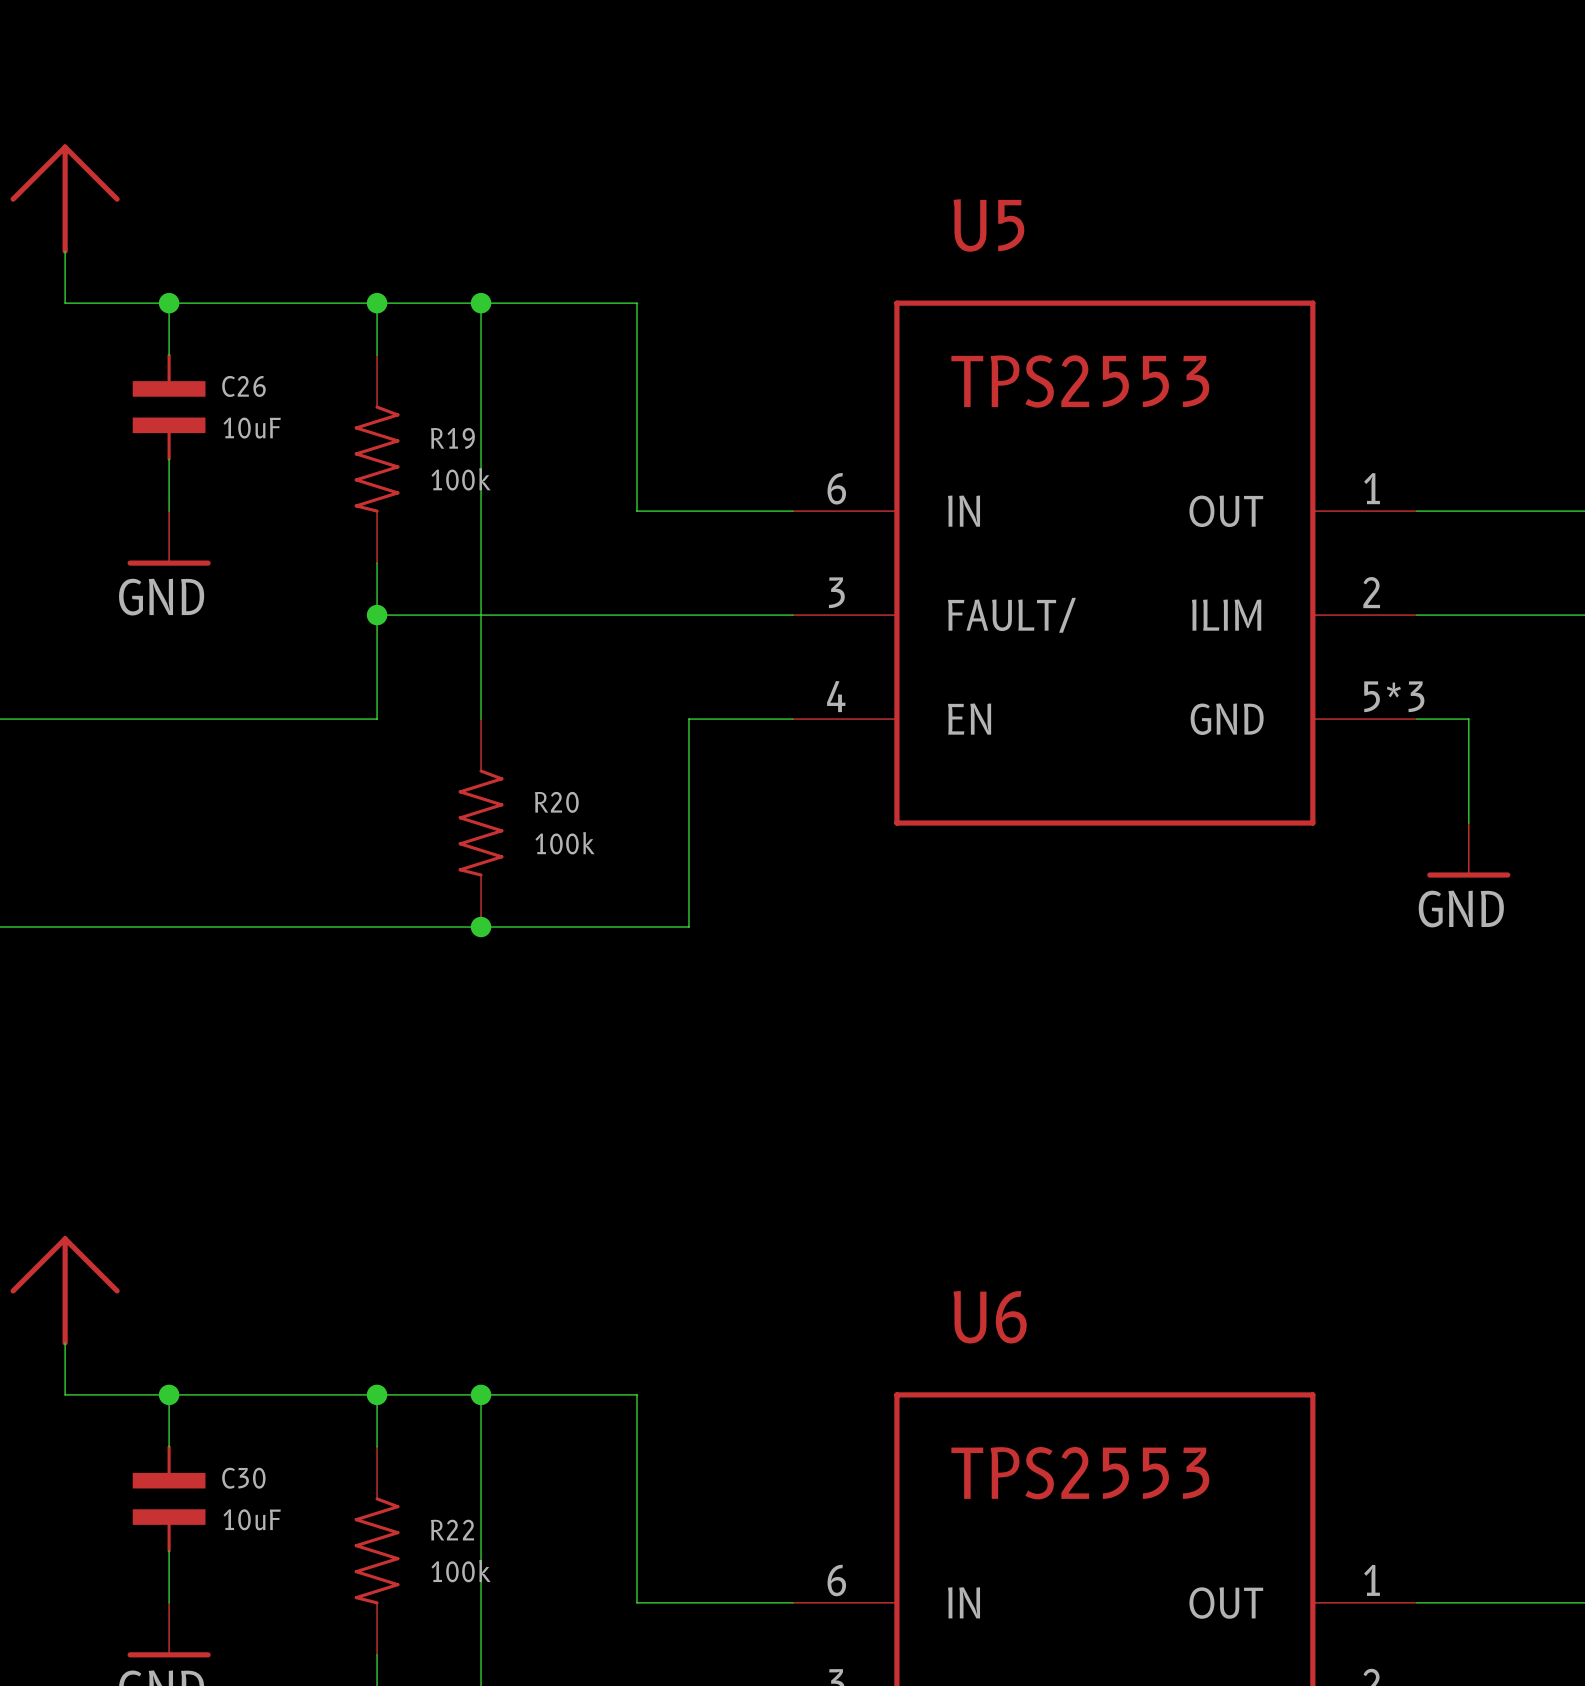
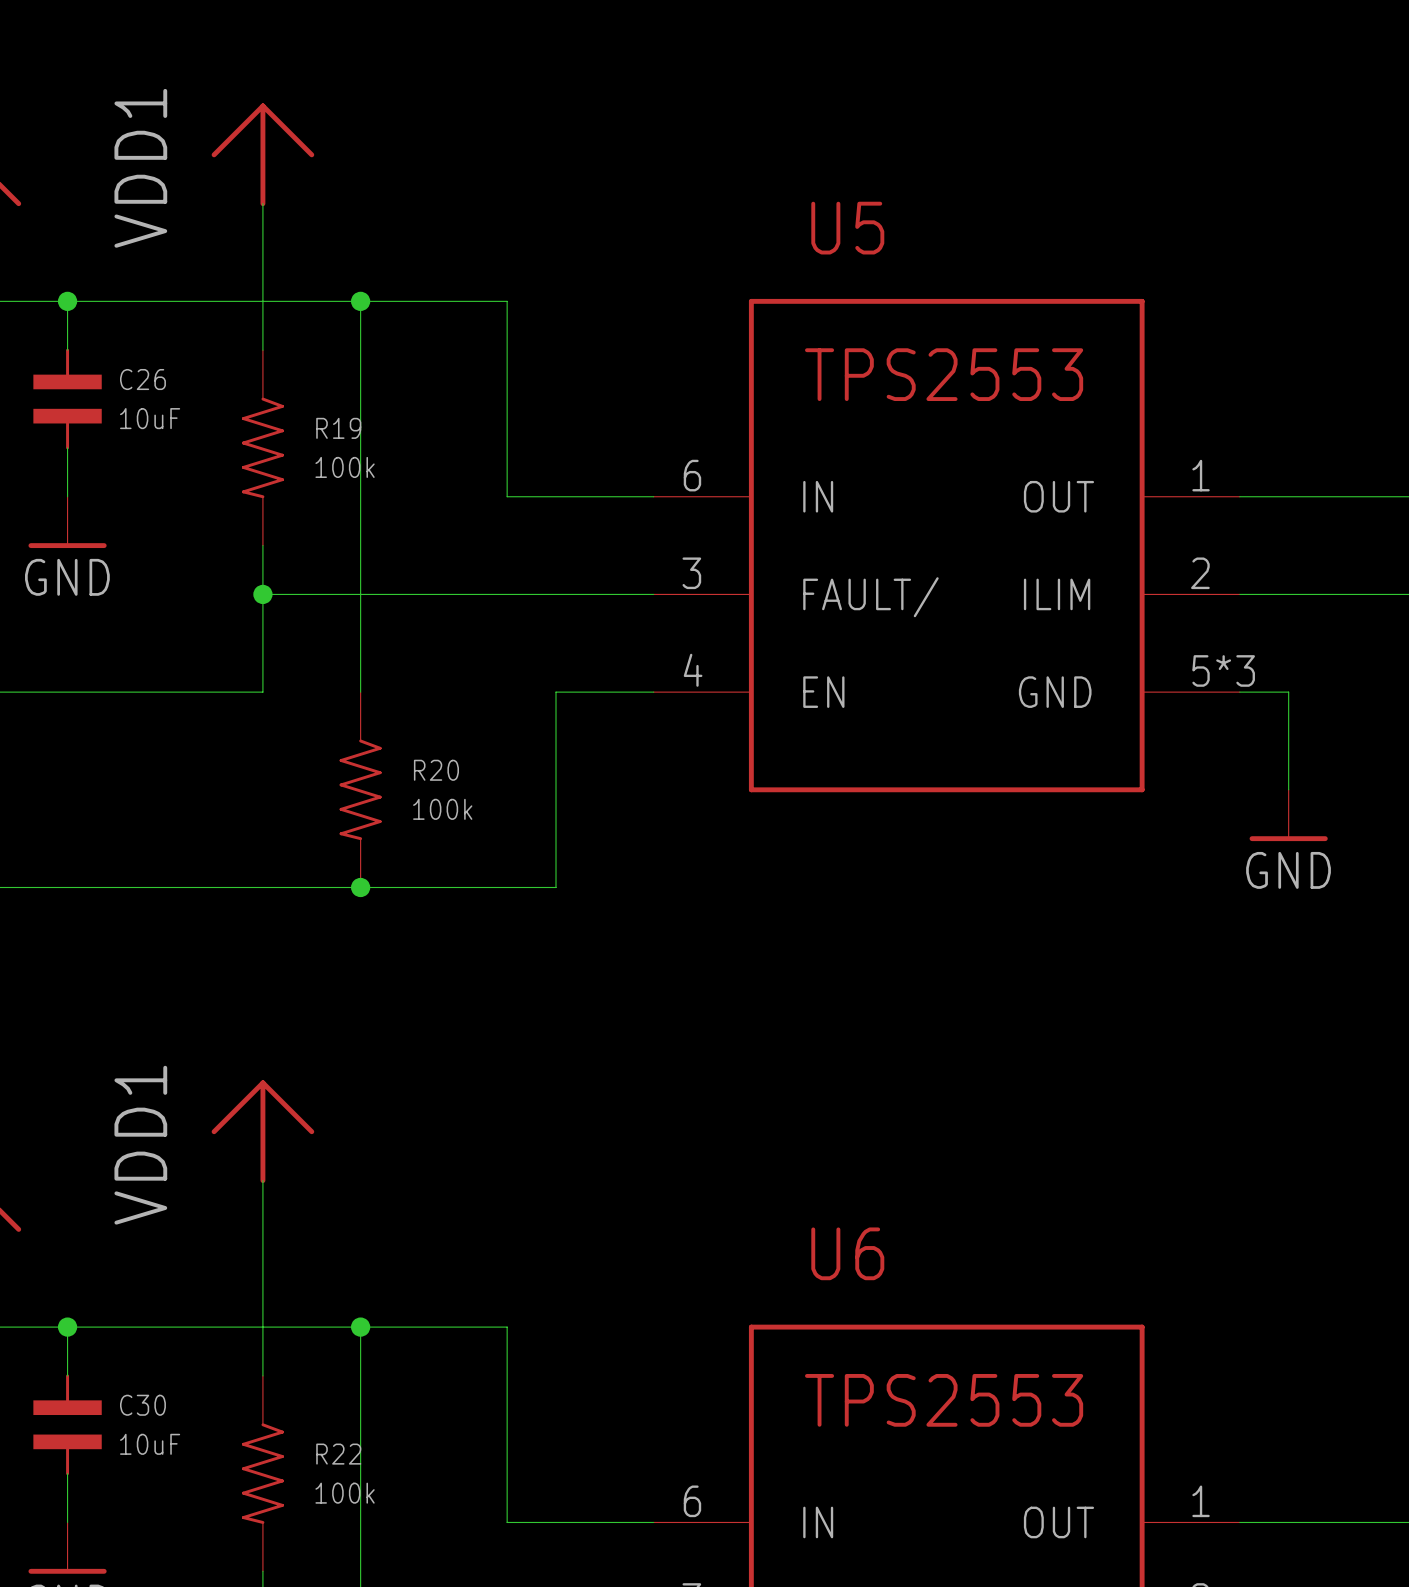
power symbol: none -> VDD1 (262, 154)
wire: none -> (262, 203) (262, 301)
junction: (377, 303) -> none
power symbol: none -> VDD1 (262, 1131)
wire: none -> (262, 1180) (262, 1327)
junction: (377, 1394) -> none

